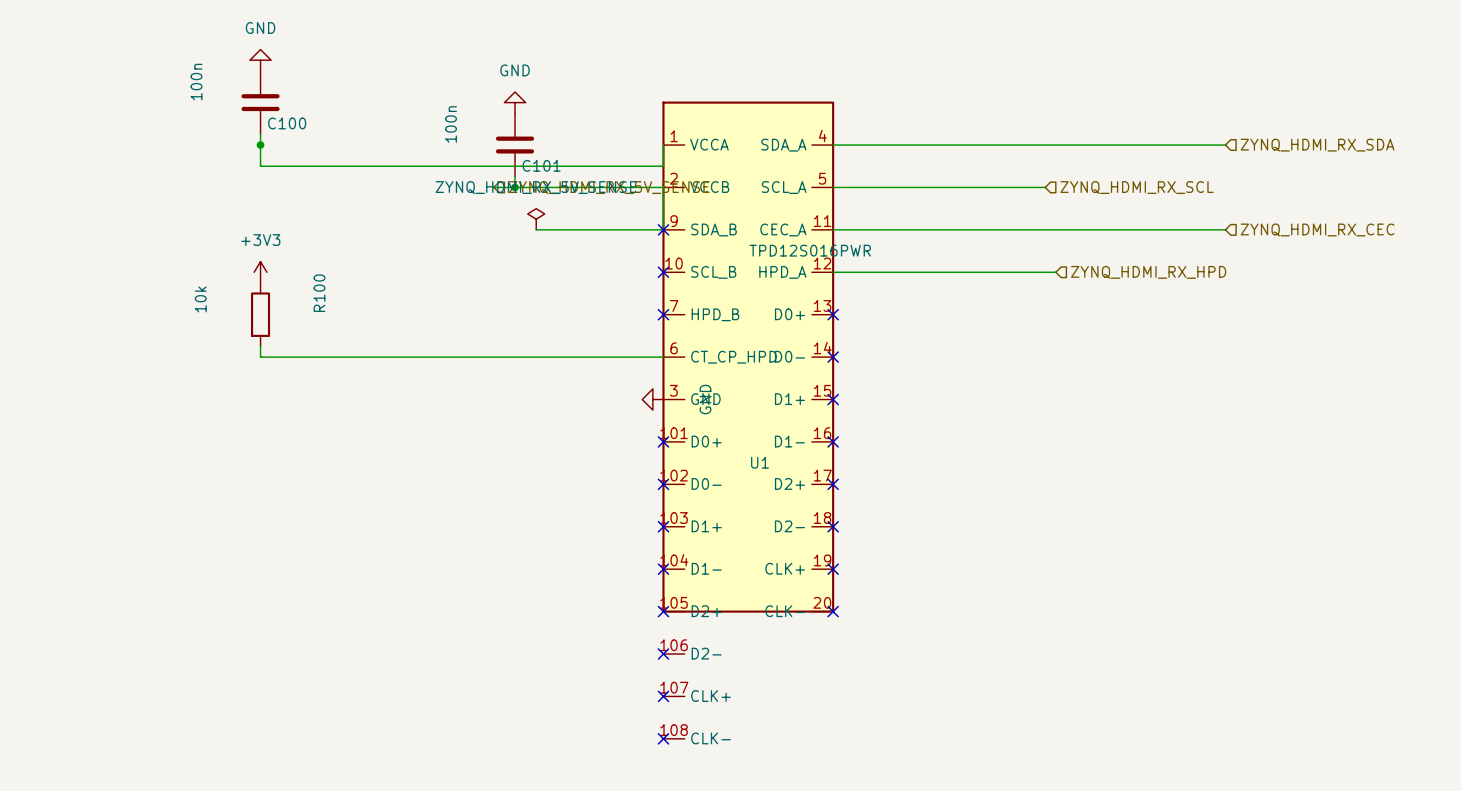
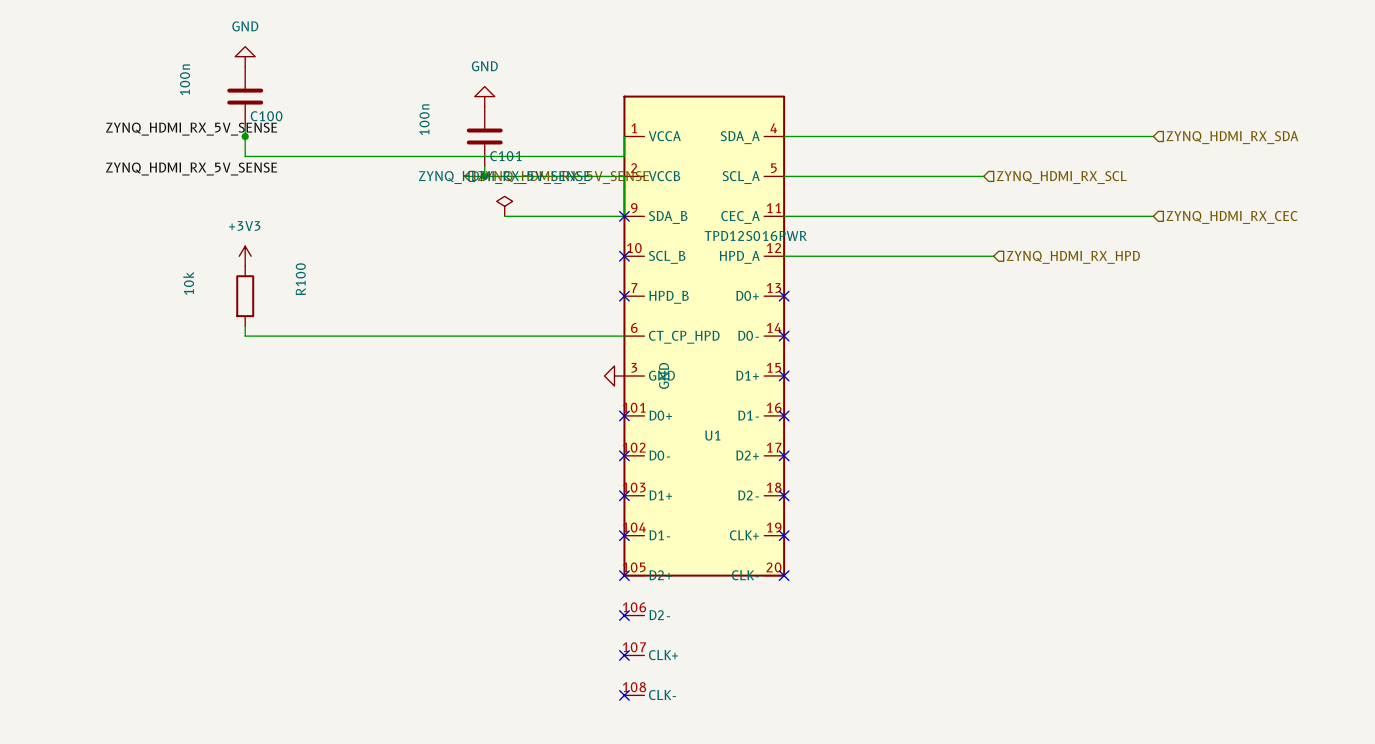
label: none -> ZYNQ_HDMI_RX_5V_SENSE (191, 129)
label: none -> ZYNQ_HDMI_RX_5V_SENSE (191, 169)

